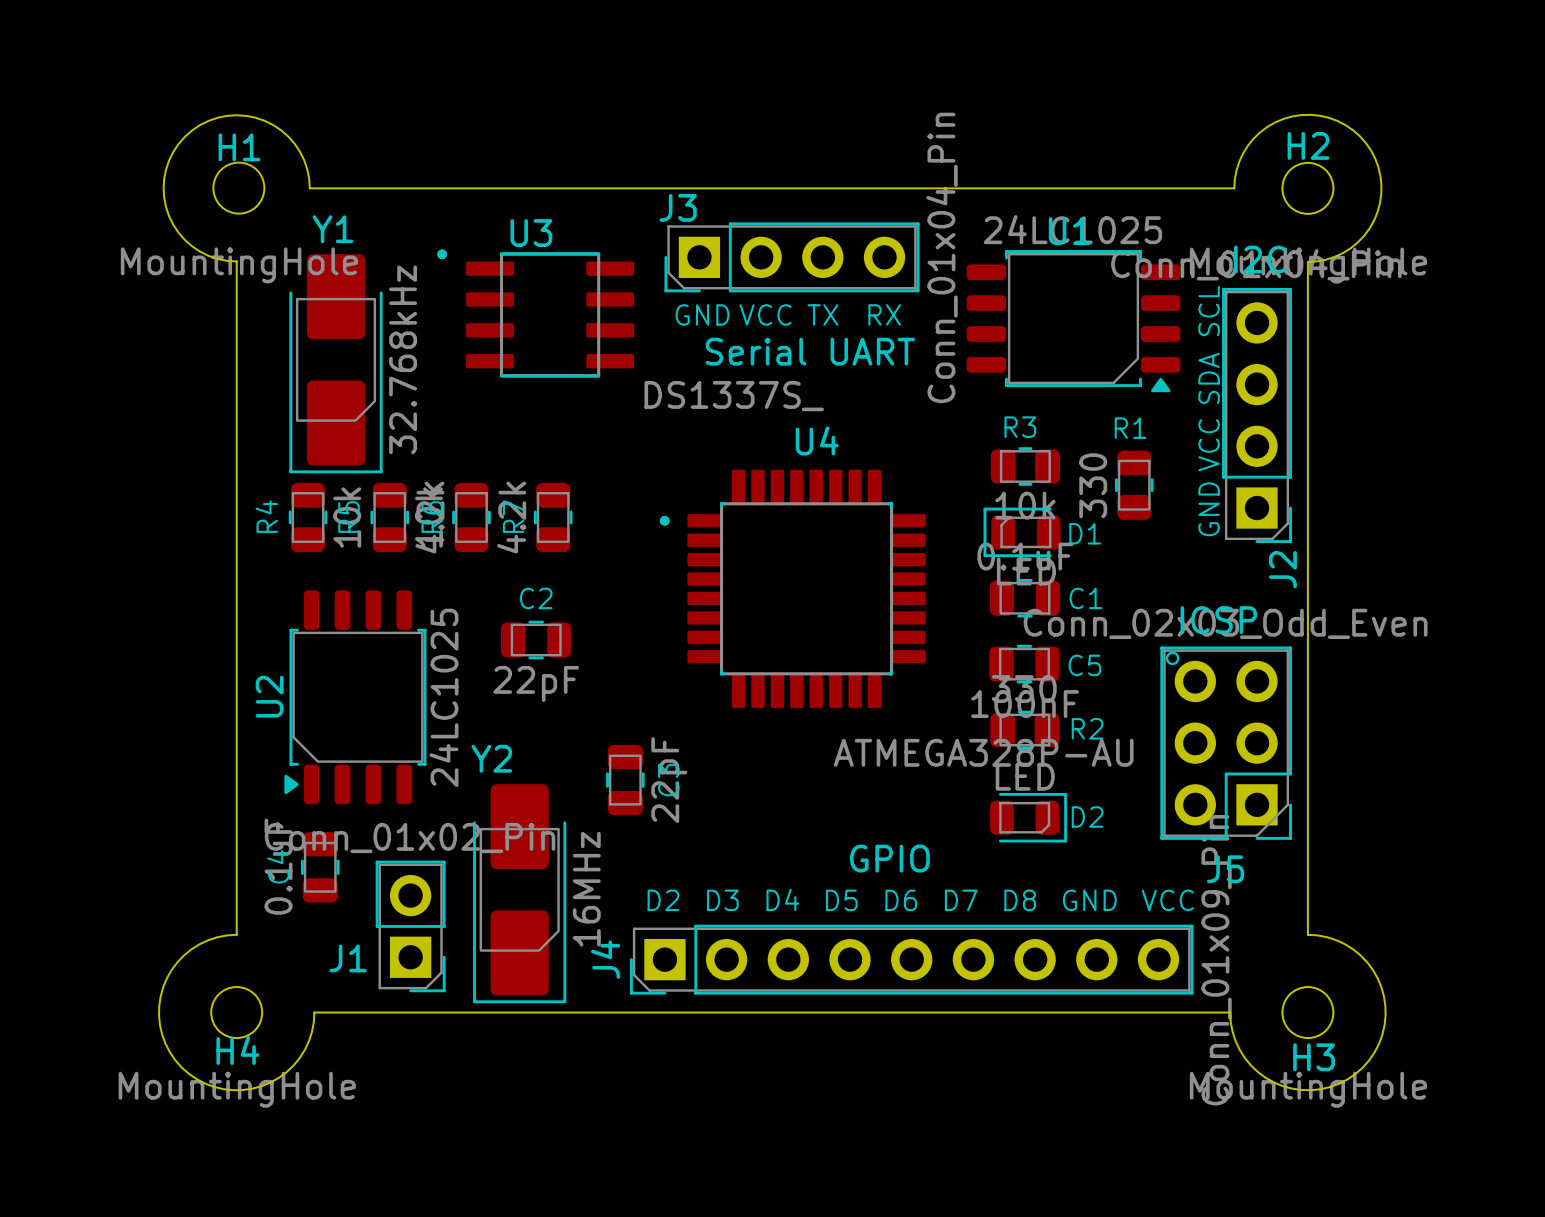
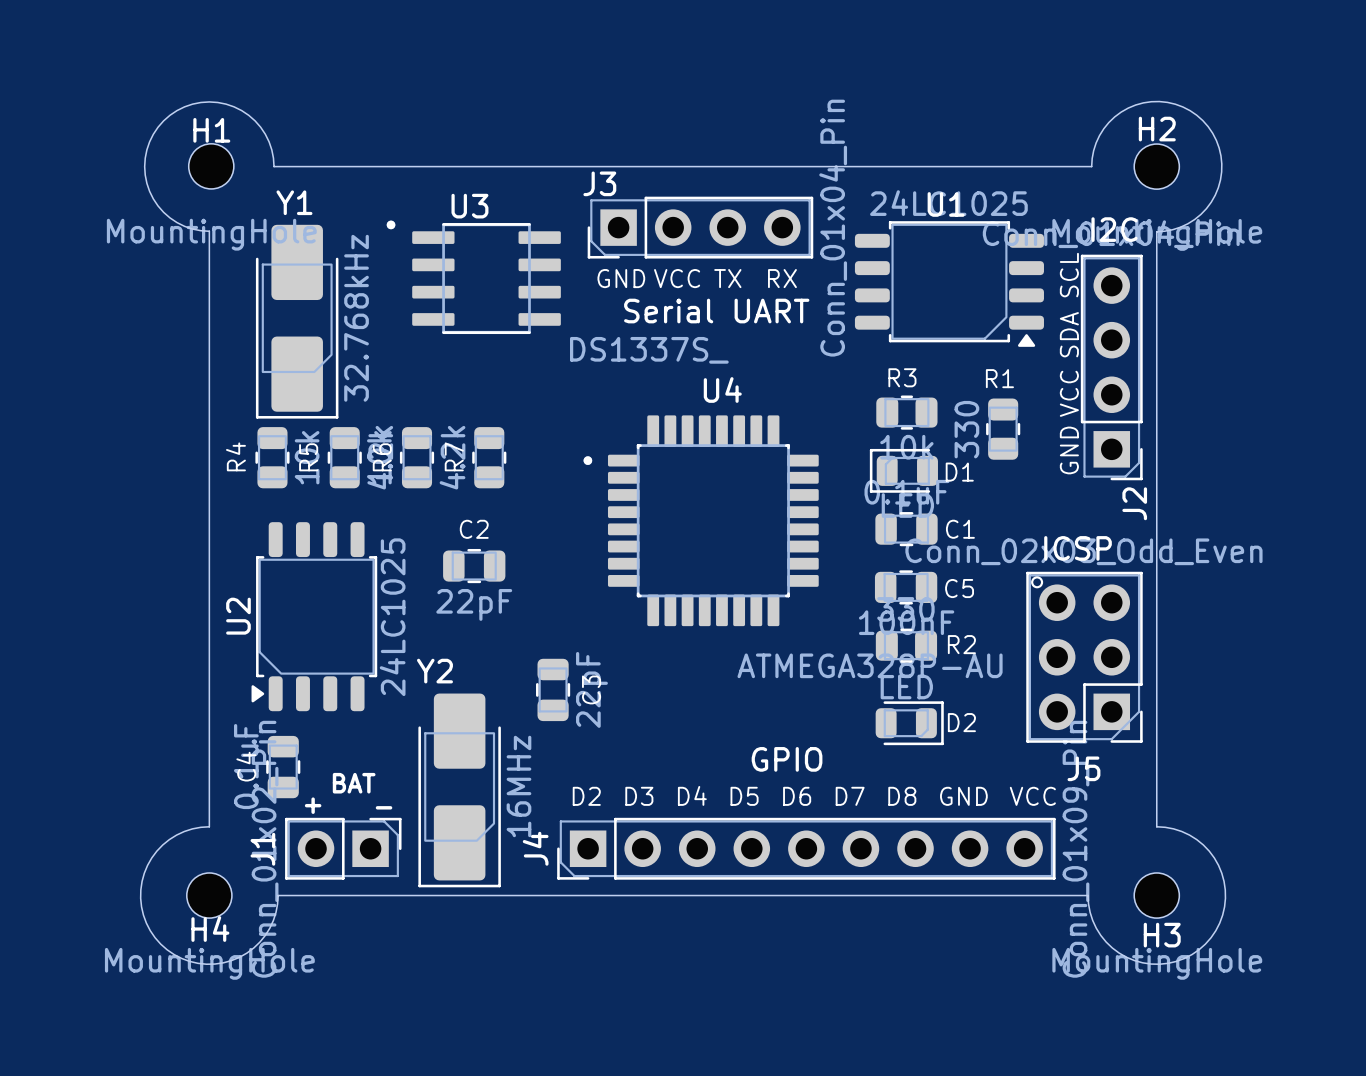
text: none -> BAT (354, 783)
text: none -> + (313, 805)
text: none -> - (384, 807)
J1 rotation: 0° (410, 926) -> 90° counterclockwise (343, 848)

